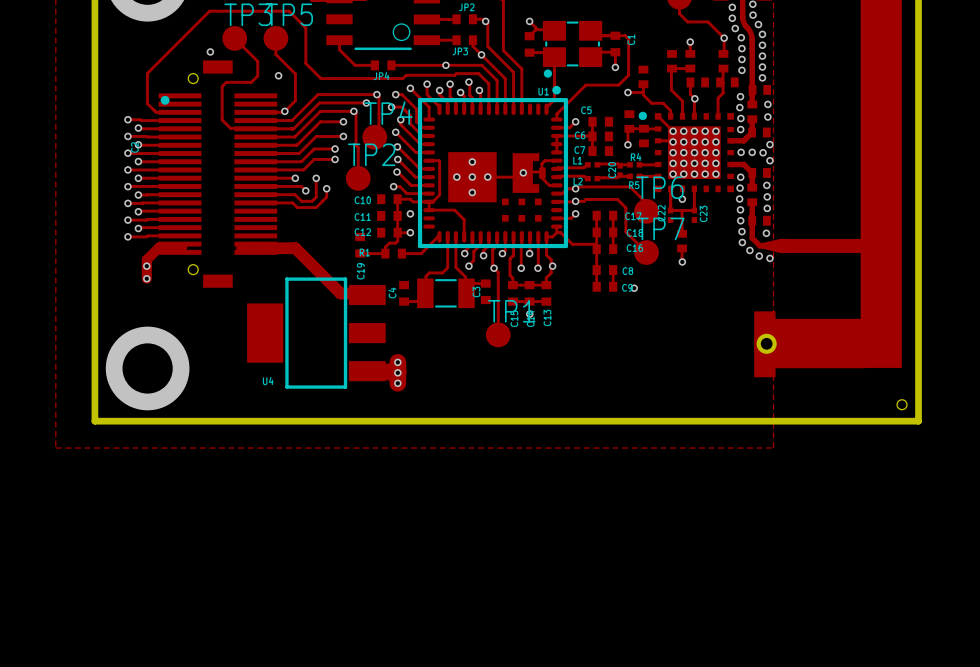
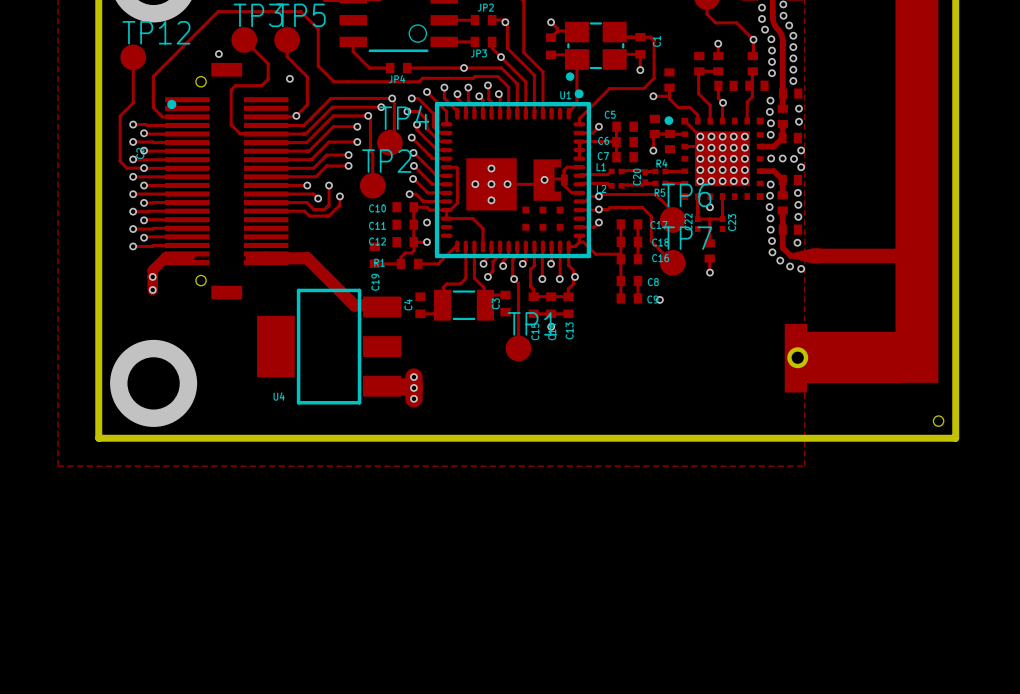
track: none -> (133, 57) (133, 103) (120, 116) (120, 161) (126, 168) (144, 168)
TP12: none -> (133, 57)

